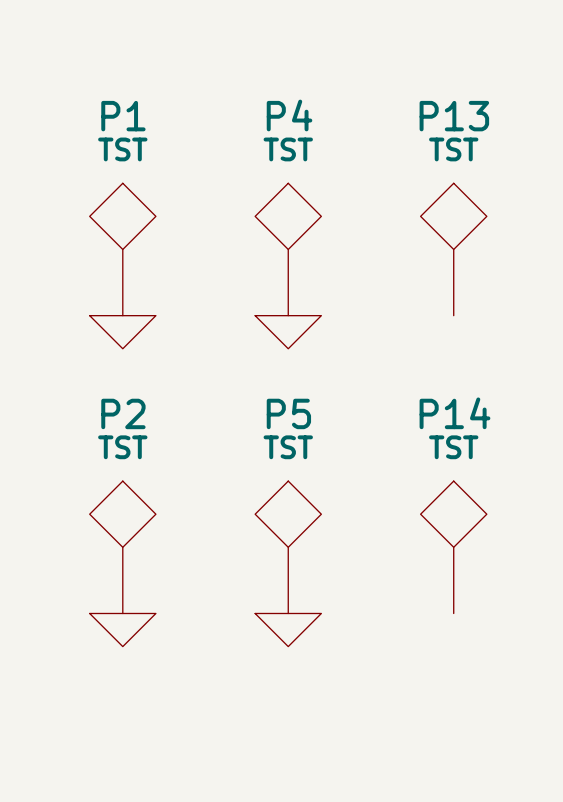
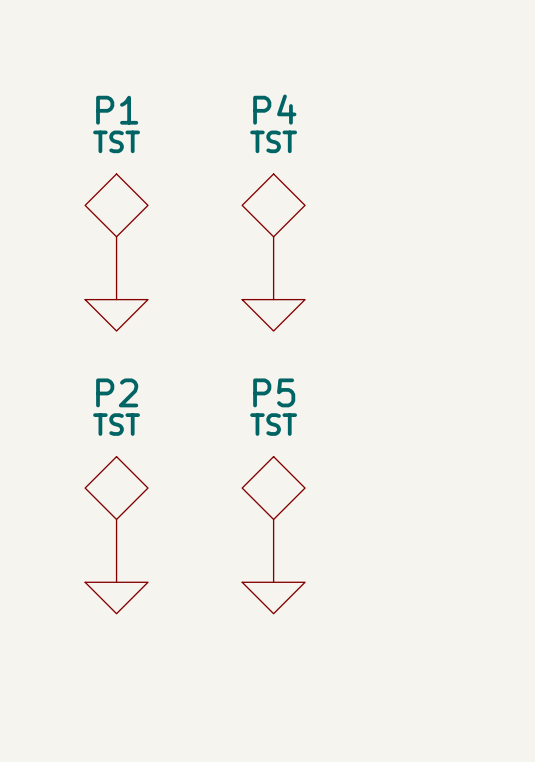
P13: TST (453, 249) -> none
P14: TST (453, 547) -> none

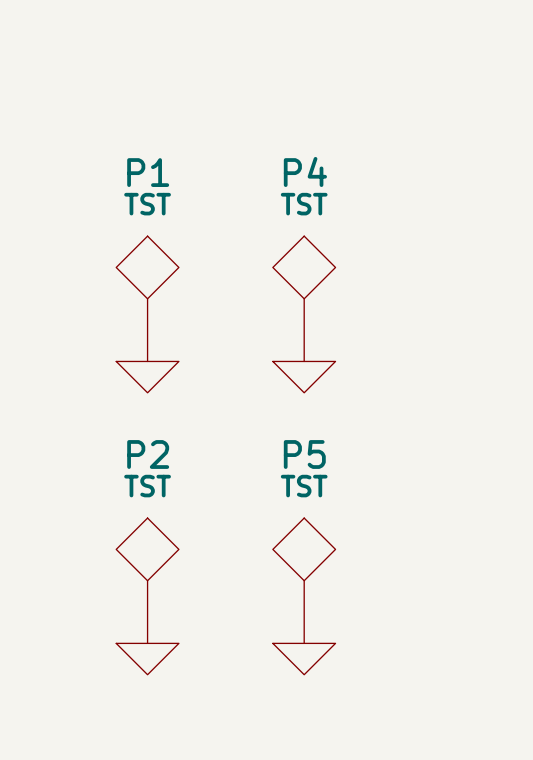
P1 position: (116, 236) -> (147, 298)
P4 position: (273, 236) -> (304, 298)
power symbol: (116, 315) -> none
power symbol: (273, 315) -> none
power symbol: none -> (147, 377)
power symbol: none -> (304, 377)
P2 position: (116, 519) -> (147, 580)
P5 position: (273, 519) -> (304, 580)
power symbol: (116, 598) -> none
power symbol: (273, 598) -> none
power symbol: none -> (147, 659)
power symbol: none -> (304, 659)

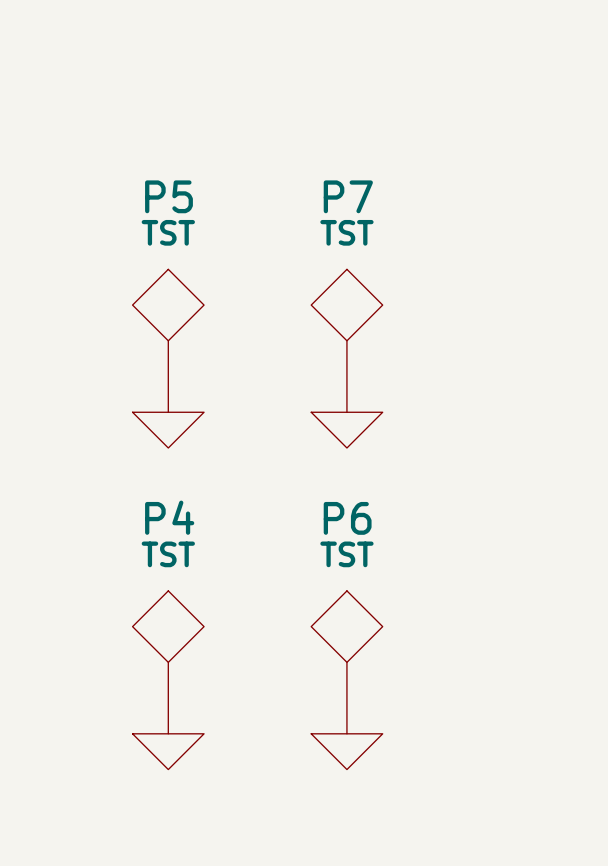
P4 name: P4 (305, 171) -> P7 (348, 196)
P1 name: P1 (148, 172) -> P5 (168, 196)
P2 name: P2 (148, 454) -> P4 (169, 517)
P5 name: P5 (304, 454) -> P6 (347, 518)

